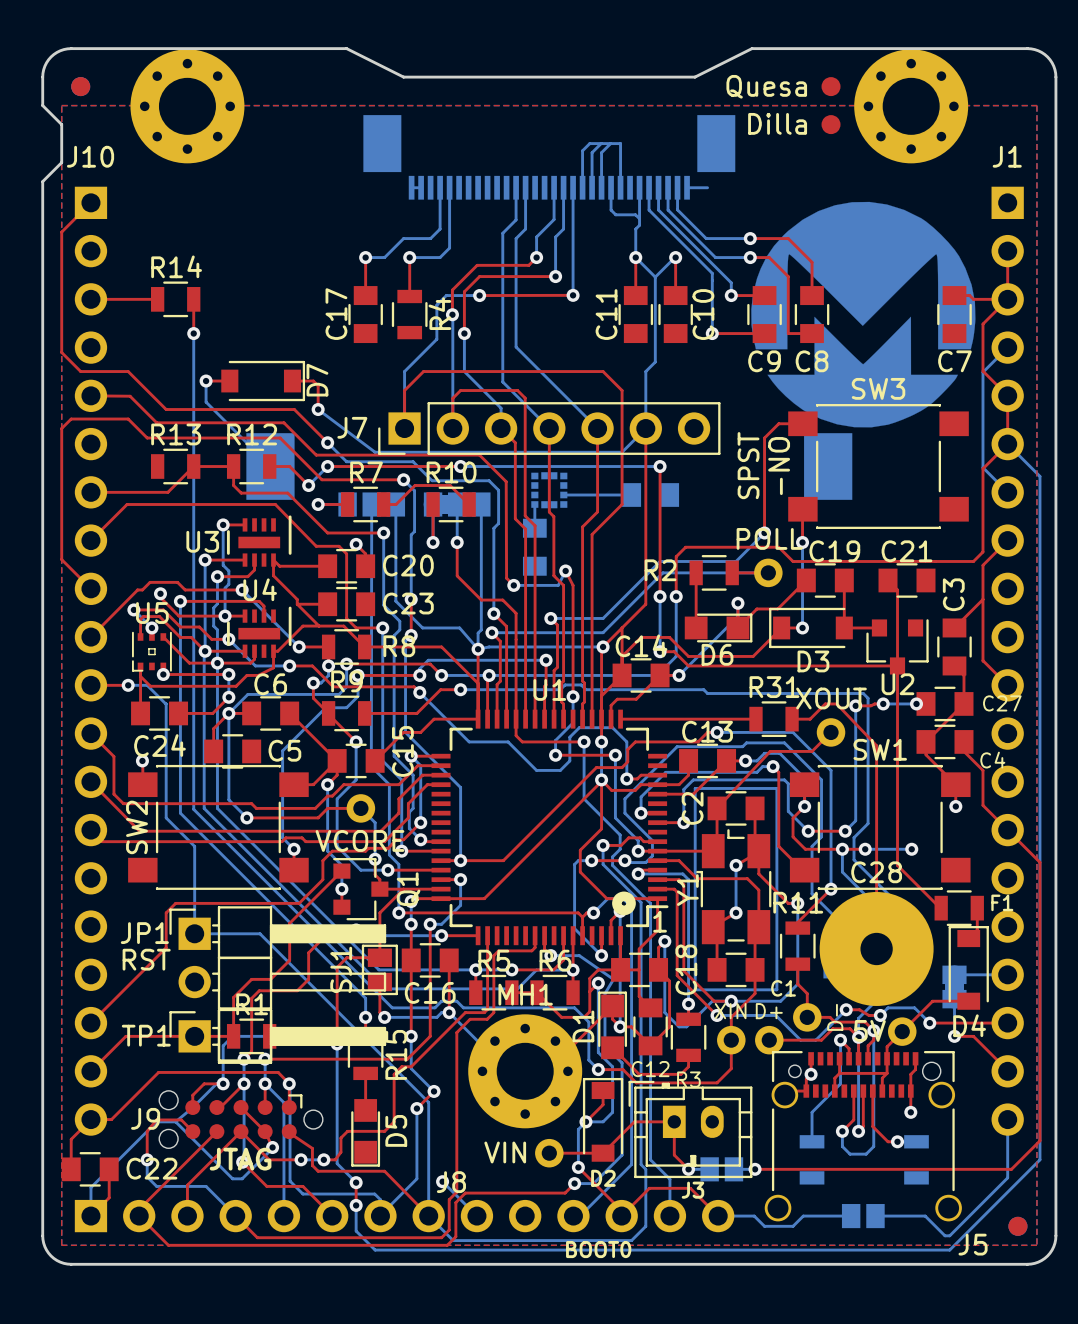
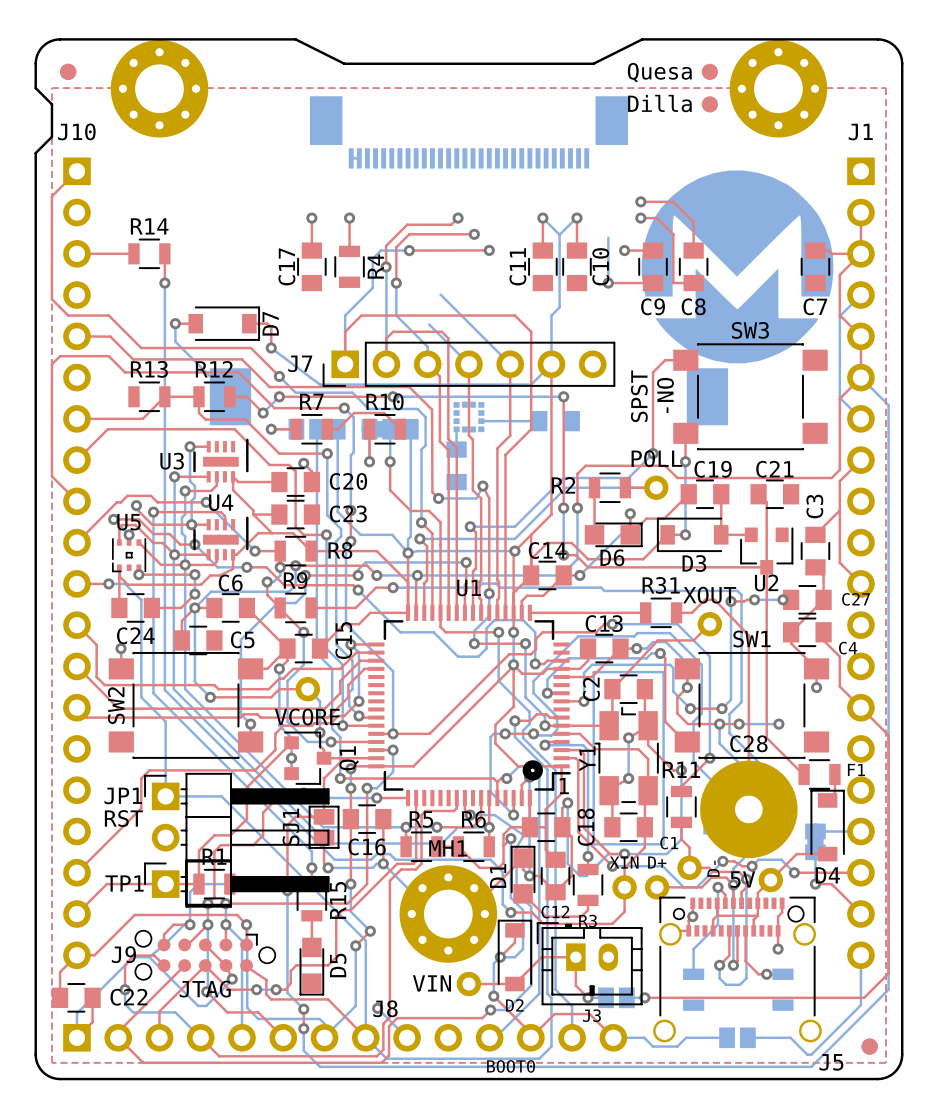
bottom track: (601, 143) (592, 152) (592, 187) -> none
bottom track: (610, 143) (601, 152) (601, 187) -> none
bottom track: (440, 187) (440, 229) (430, 238) (403, 238) (384, 257) (365, 257) -> none
bottom track: (449, 187) (449, 248) (440, 257) (409, 257) -> none
bottom track: (516, 187) (516, 219) (502, 233) (502, 381) -> none
bottom track: (525, 187) (525, 229) (516, 238) (516, 347) -> none
bottom track: (554, 187) (554, 219) (536, 237) (536, 257) -> none
bottom track: (563, 187) (563, 229) (555, 237) (555, 276) -> none
bottom track: (573, 187) (573, 295) -> none
bottom track: (582, 187) (582, 150) (589, 143) (620, 143) (620, 187) -> none
bottom track: (611, 187) (611, 210) (615, 214) (635, 214) (639, 218) -> none
bottom track: (639, 187) (639, 225) (635, 229) (635, 257) -> none
bottom track: (649, 187) (649, 210) (712, 273) (712, 280) -> none
bottom track: (658, 187) (658, 210) (731, 282) (731, 295) -> none
bottom track: (668, 187) (668, 210) (715, 257) (750, 257) -> none
bottom track: (677, 187) (677, 209) (706, 238) (750, 238) -> none
bottom track: (687, 187) (707, 187) -> none

